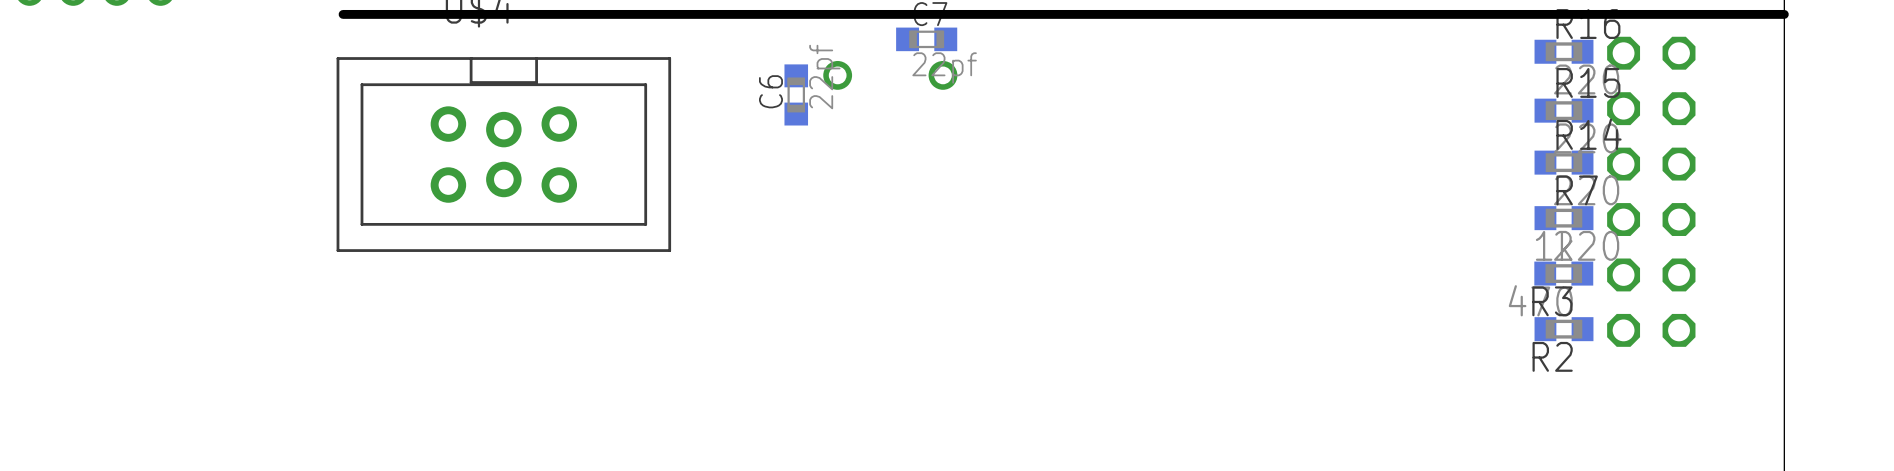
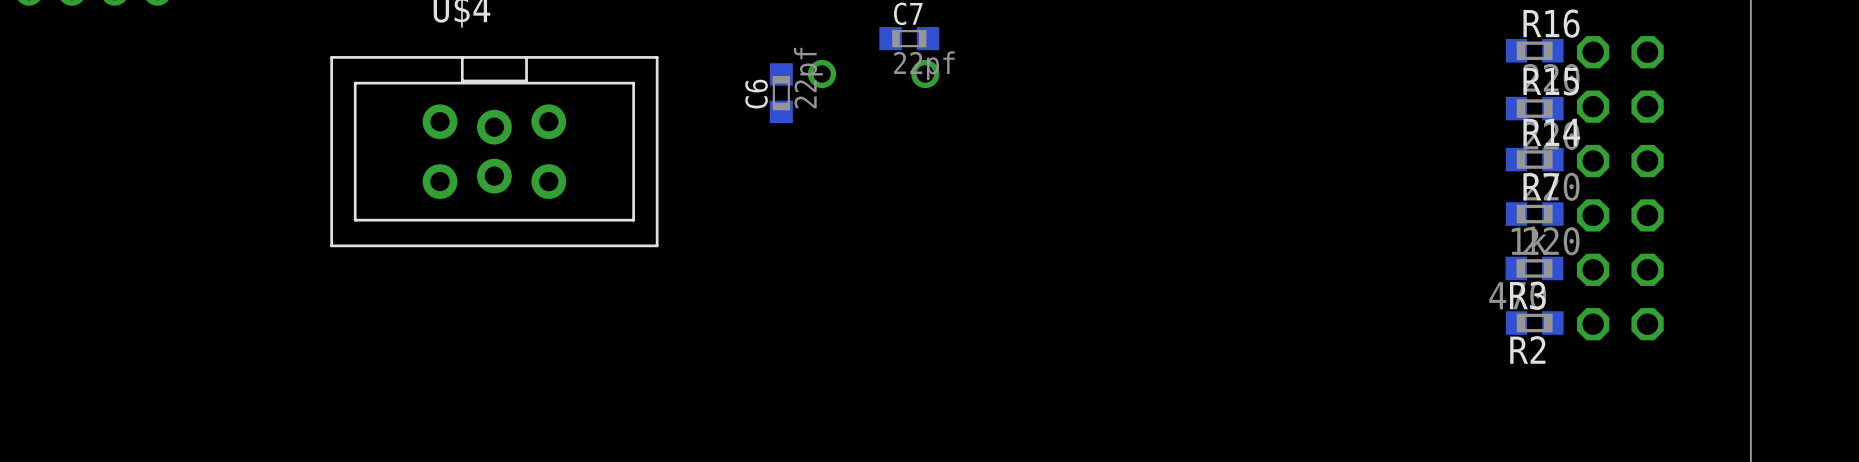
board edge: (1784, 14) (343, 14) -> none

